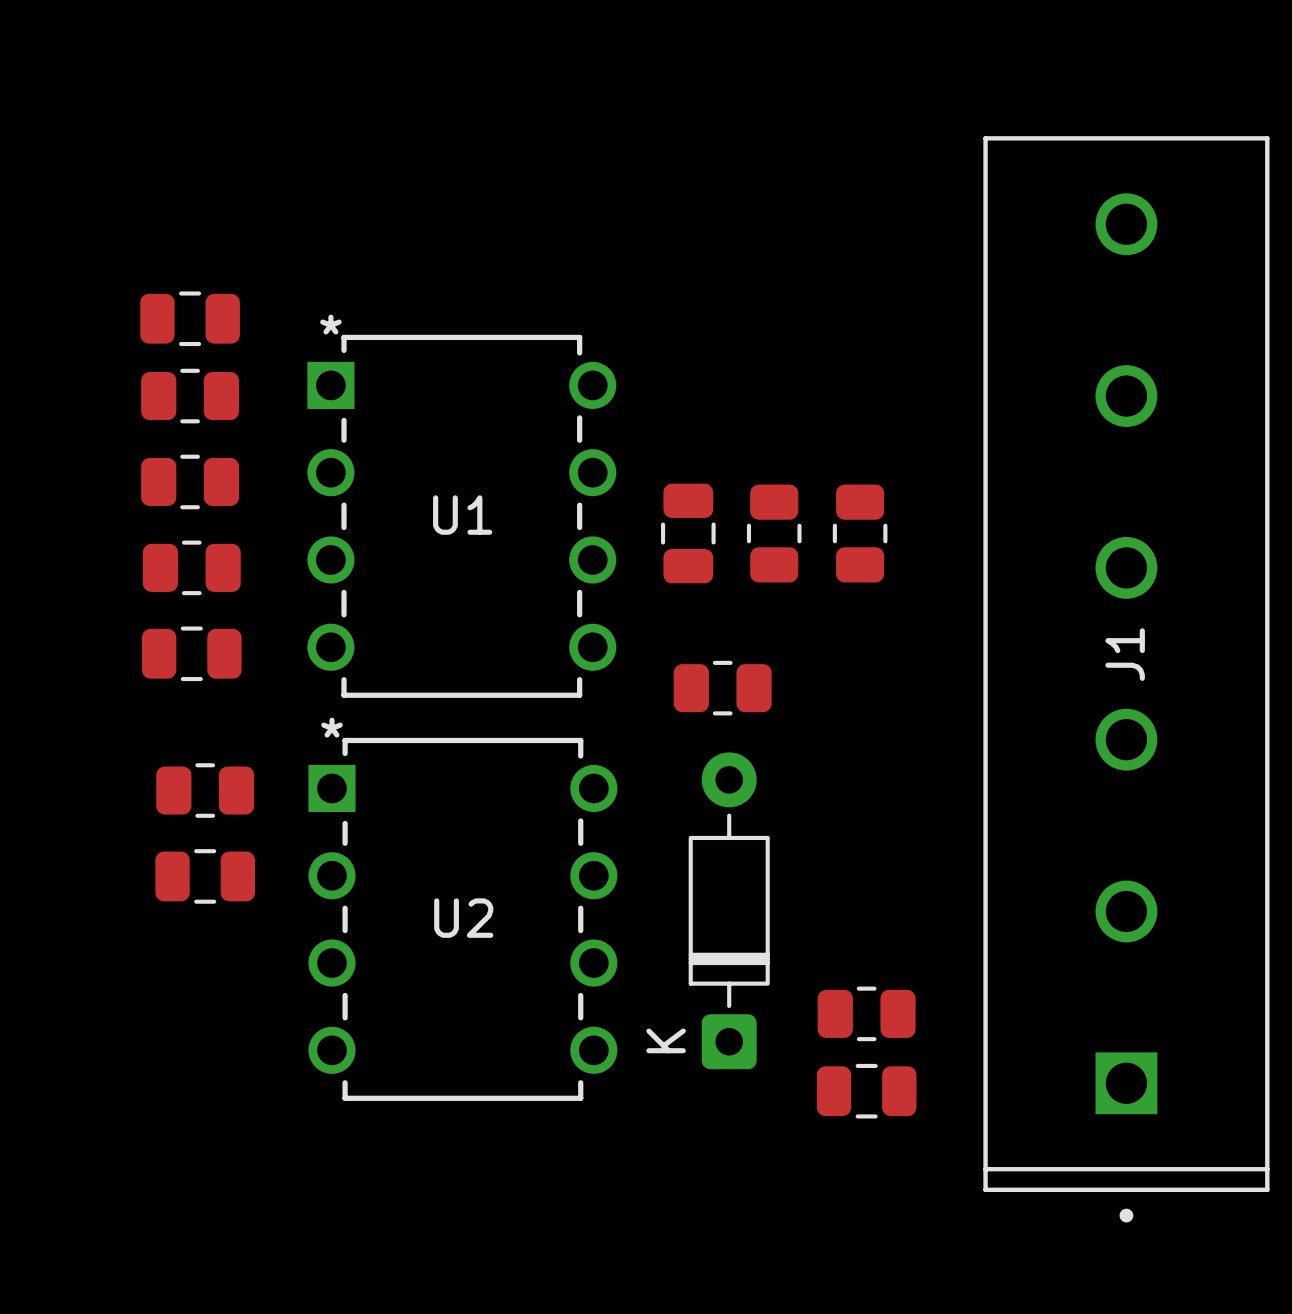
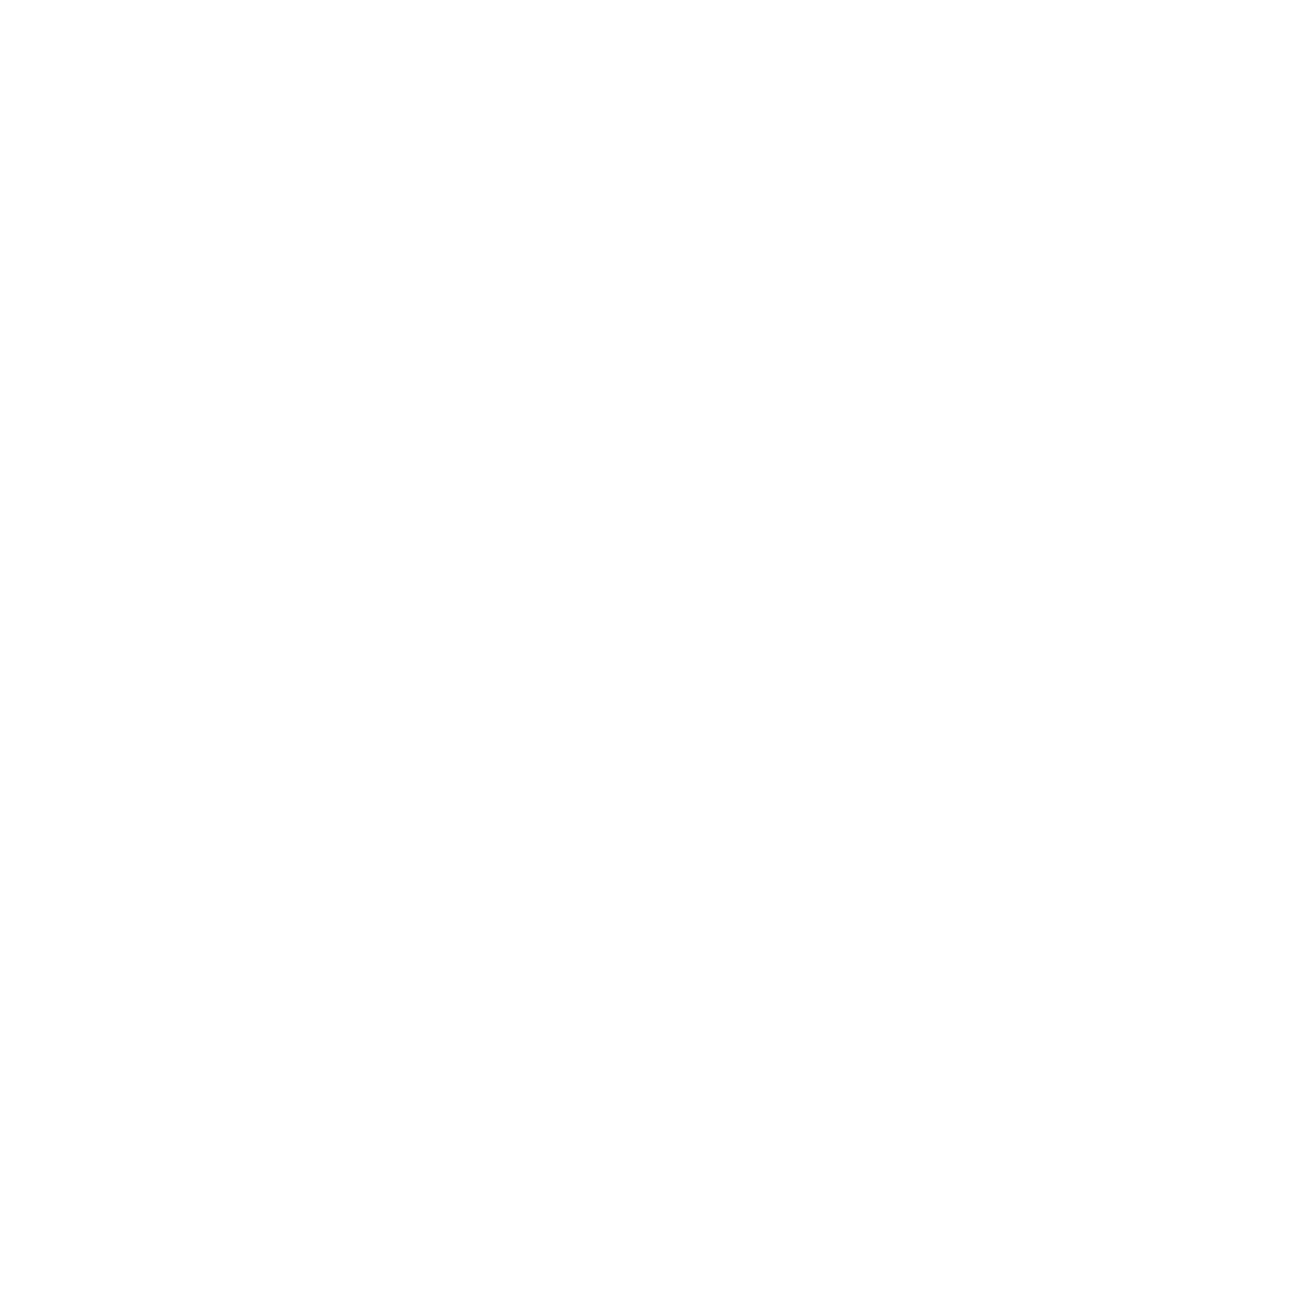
part: (190, 318) -> none
part: (190, 396) -> none
part: (190, 481) -> none
U1: (461, 516) -> none
part: (688, 533) -> none
part: (774, 533) -> none
part: (860, 533) -> none
part: (191, 567) -> none
part: (191, 653) -> none
J1: (1126, 679) -> none
part: (722, 688) -> none
part: (205, 790) -> none
part: (205, 876) -> none
part: (729, 910) -> none
U2: (462, 919) -> none
part: (866, 1013) -> none
part: (866, 1091) -> none

